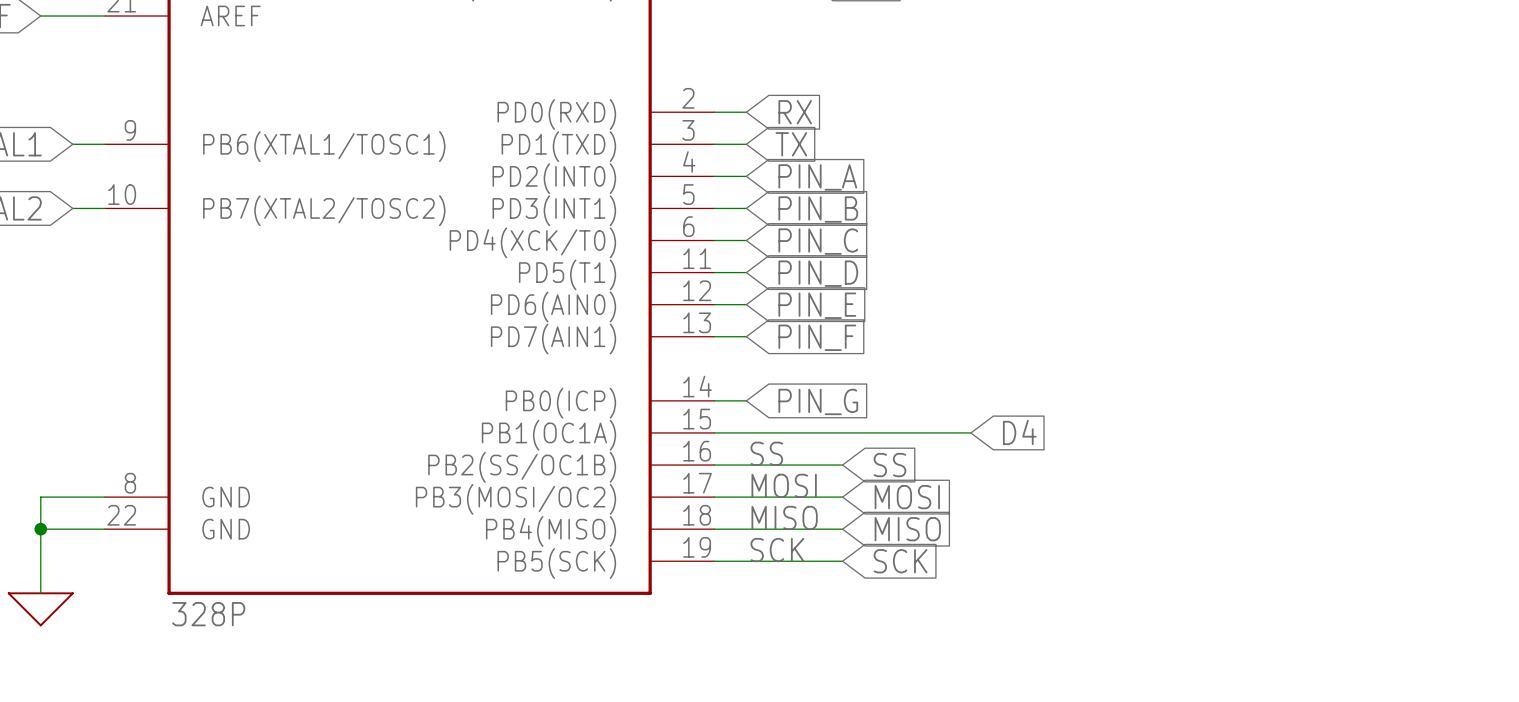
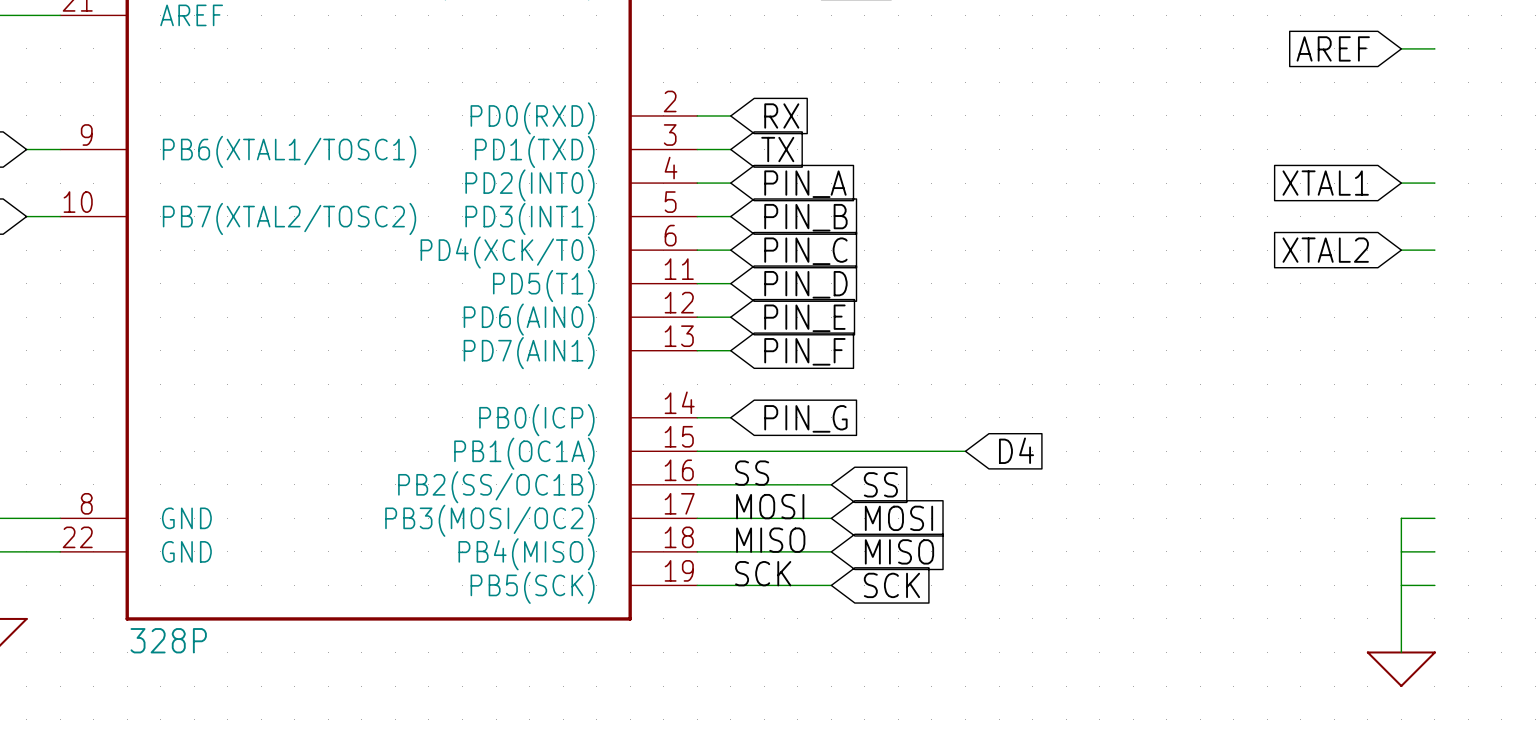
global label: none -> AREF (1333, 48)
wire: none -> (1401, 48) (1434, 48)
global label: none -> XTAL1 (1325, 183)
wire: none -> (1401, 183) (1434, 183)
global label: none -> XTAL2 (1325, 250)
wire: none -> (1401, 250) (1434, 250)
wire: none -> (1434, 518) (1401, 518) (1401, 652)
wire: none -> (1401, 551) (1434, 551)
wire: none -> (1401, 585) (1434, 585)
power symbol: none -> (1401, 669)

